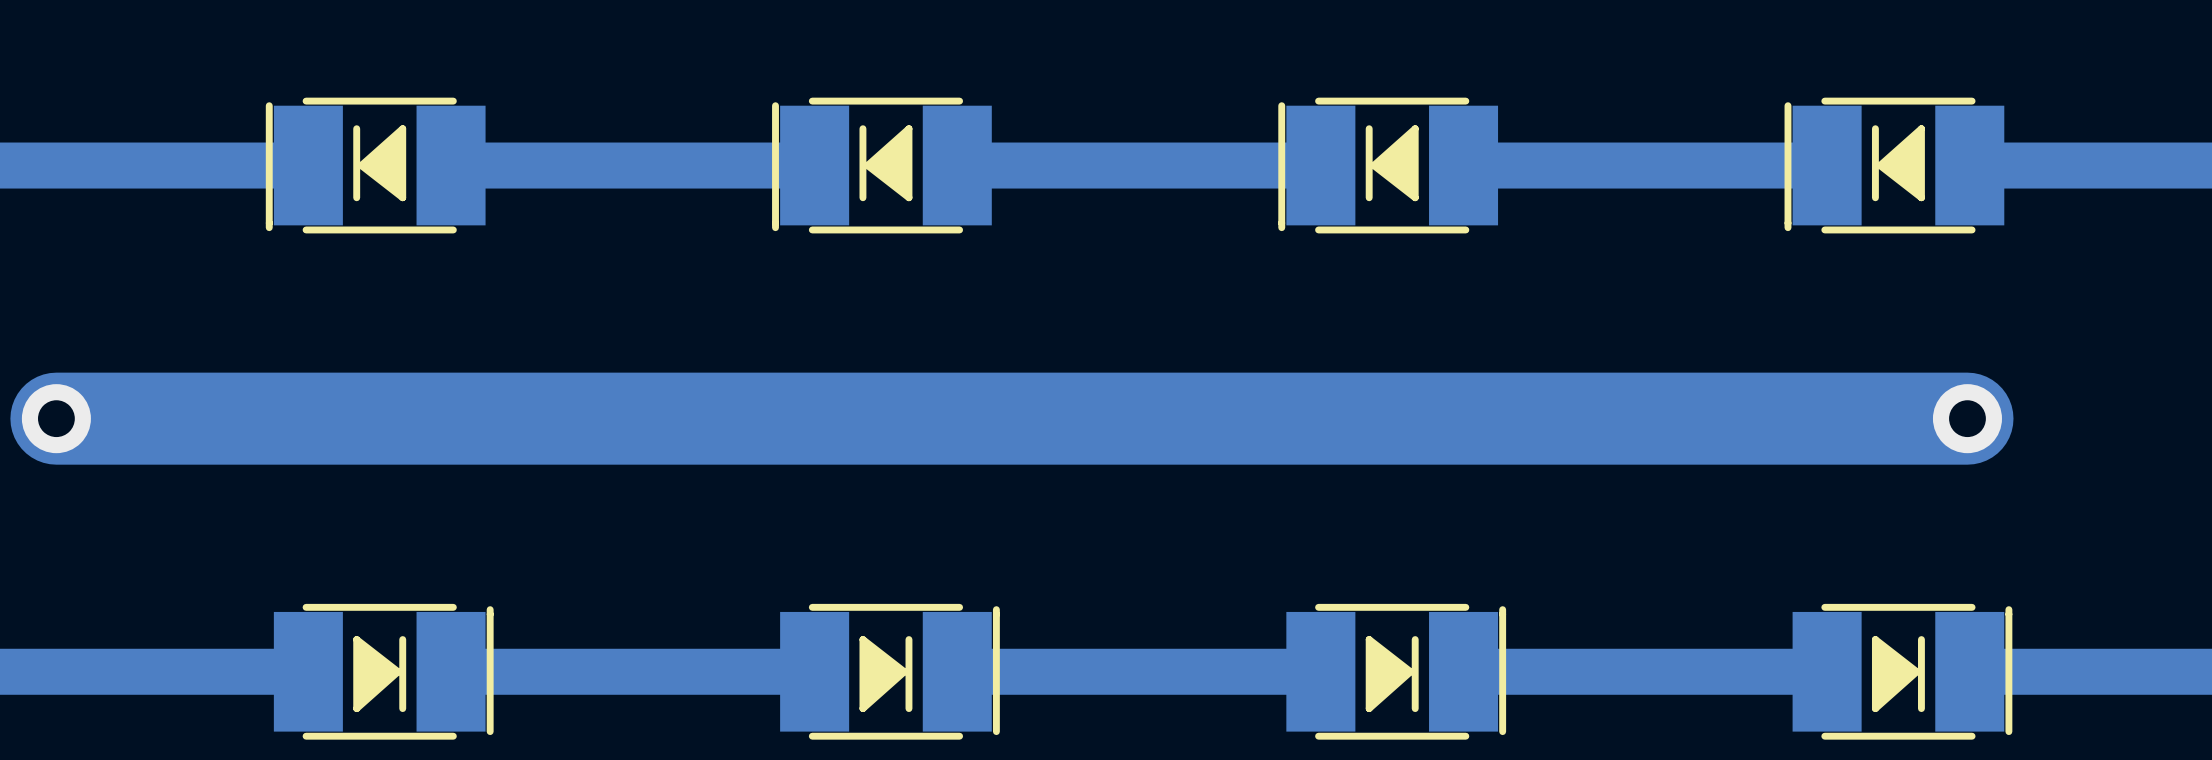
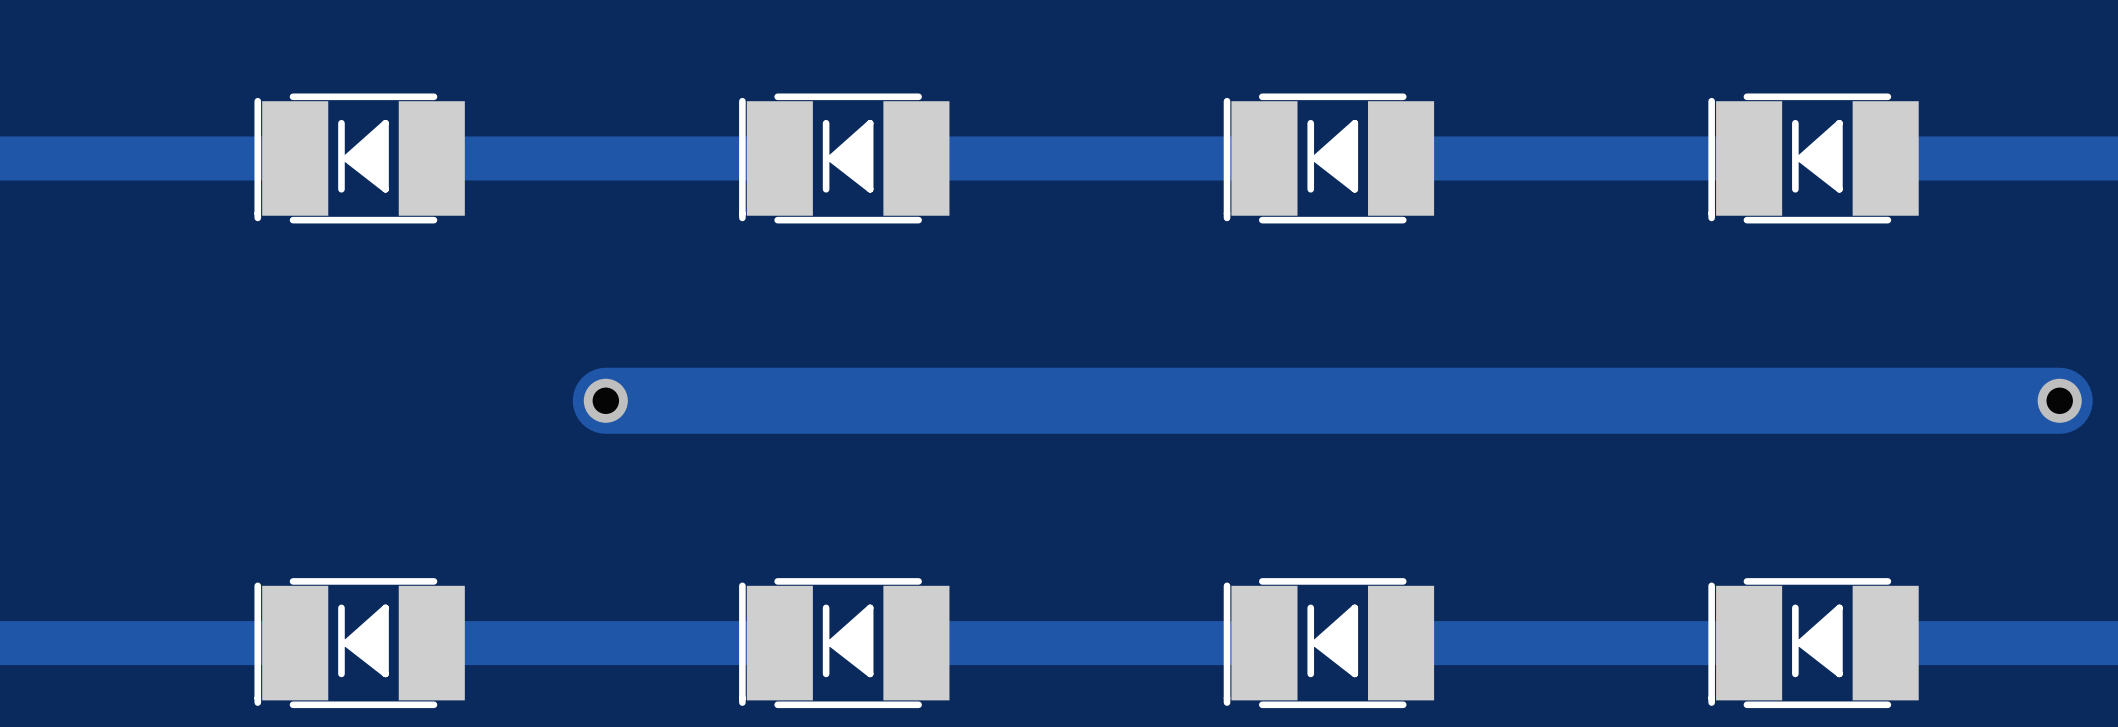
via: (56, 418) -> none
track: (632, 418) (56, 418) -> none
via: none -> (605, 400)
track width: thick (1967, 418) (632, 418) -> thin (1883, 400) (605, 400)
via: (1967, 418) -> none
track: none -> (2059, 400) (1883, 400)
via: none -> (2059, 400)
part rotation: 0° (383, 671) -> 180° (359, 643)
part rotation: 0° (889, 671) -> 180° (844, 643)
part rotation: 0° (1396, 671) -> 180° (1328, 643)
part rotation: 0° (1902, 671) -> 180° (1813, 643)

